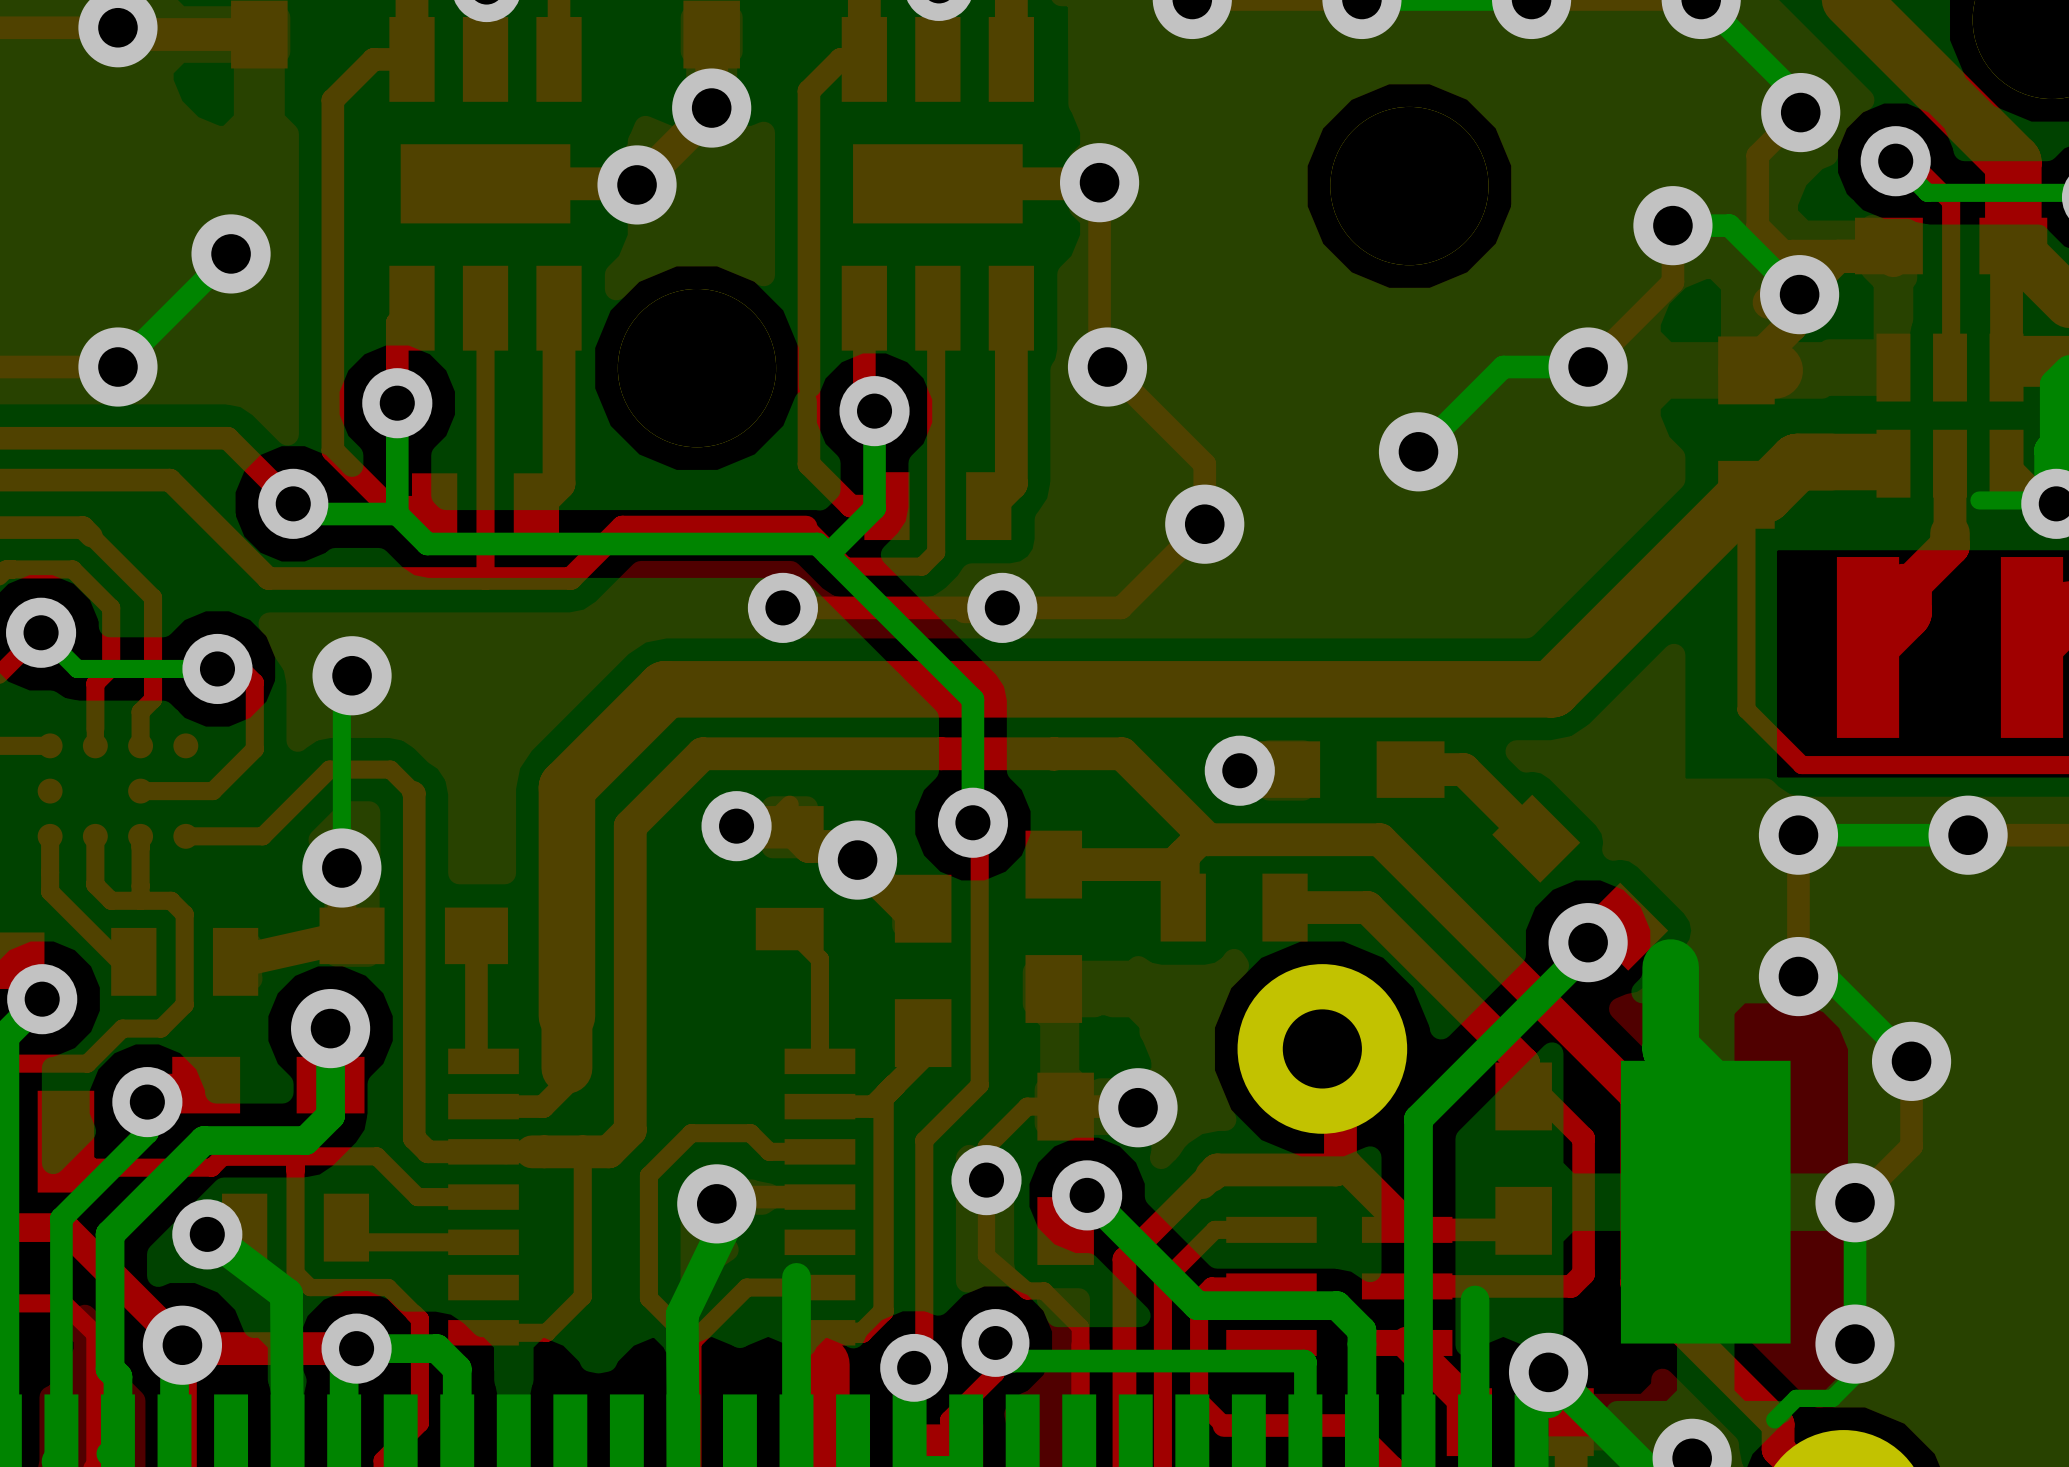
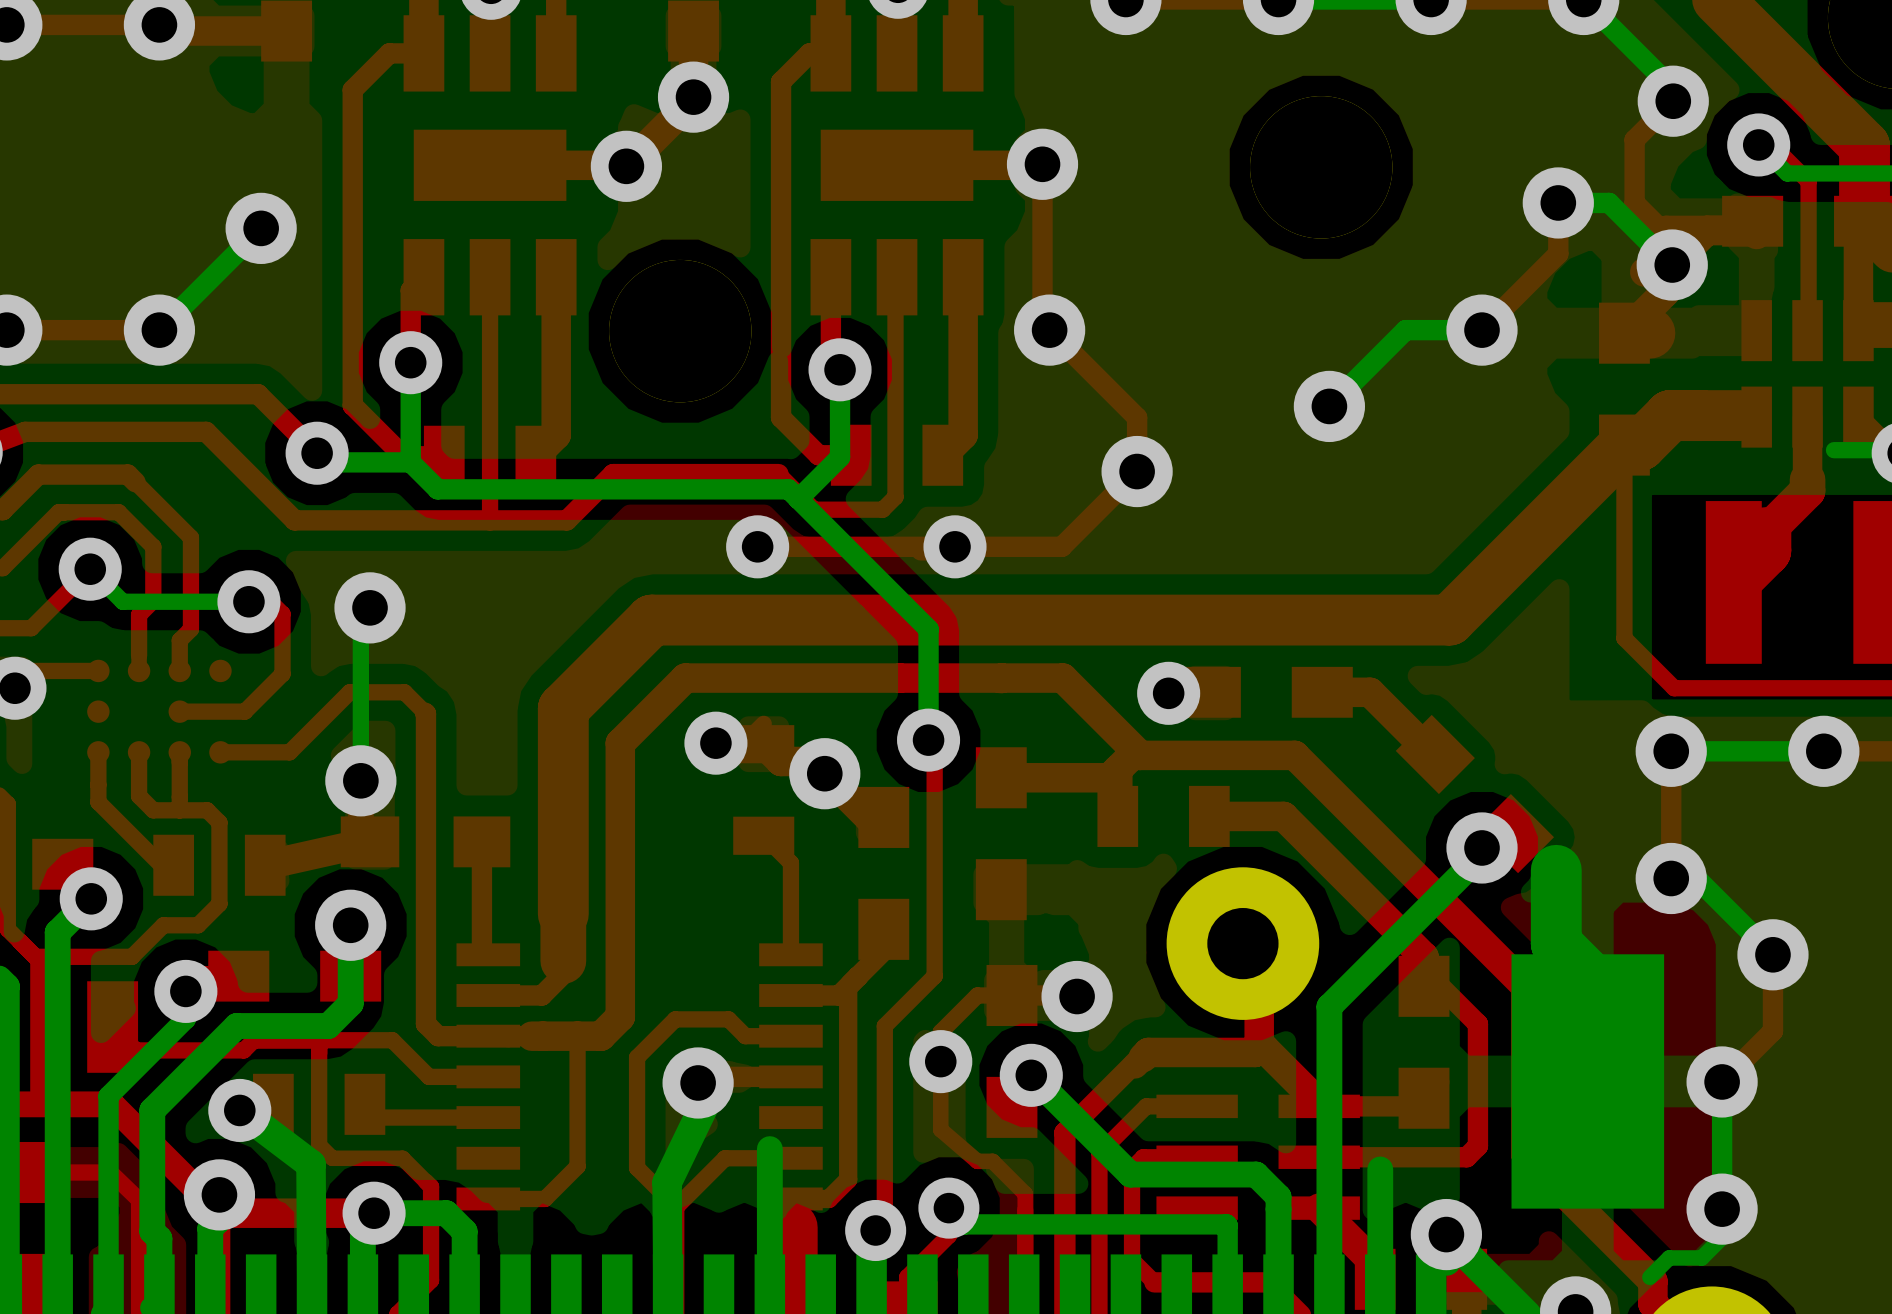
via position: (182, 1345) -> (219, 1194)

